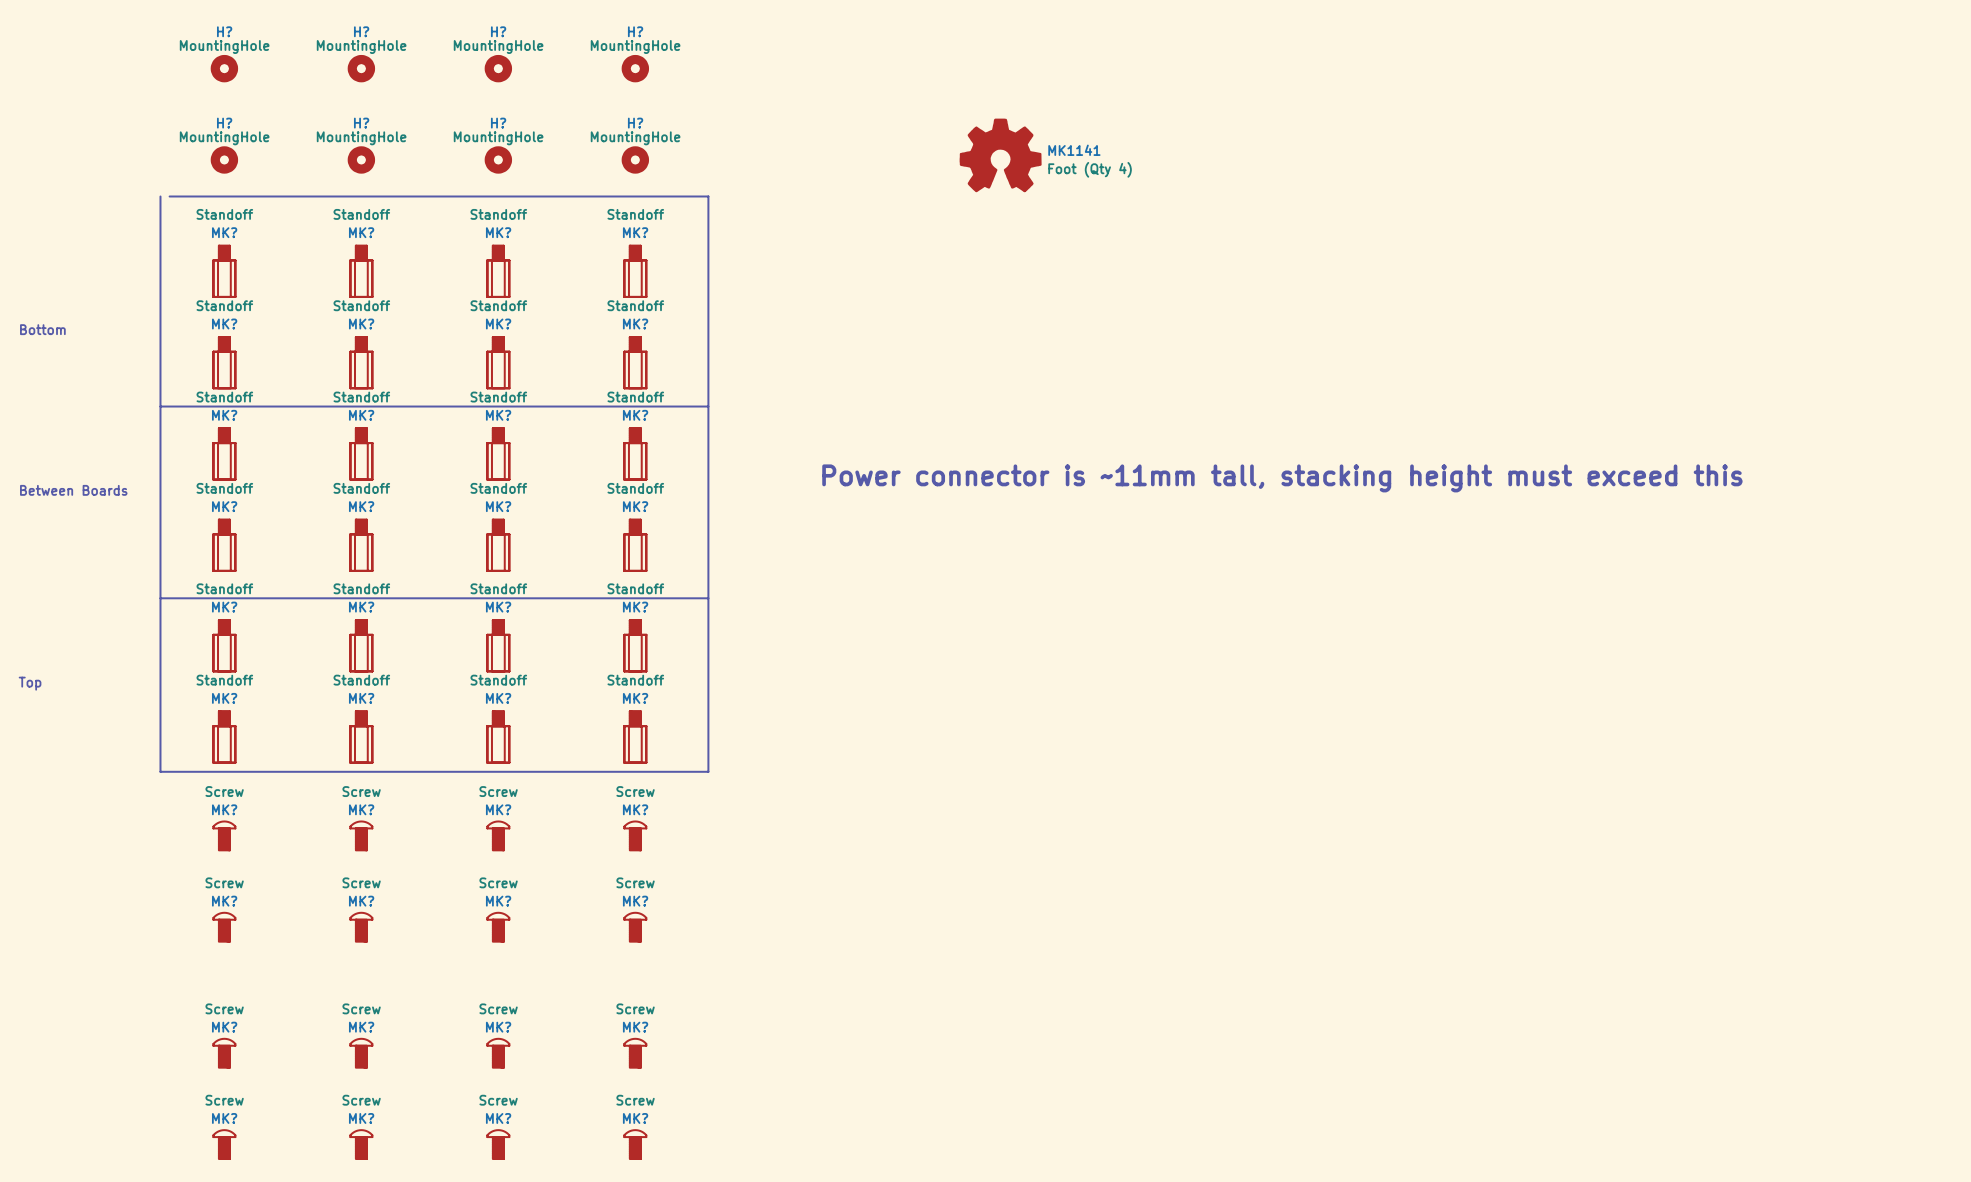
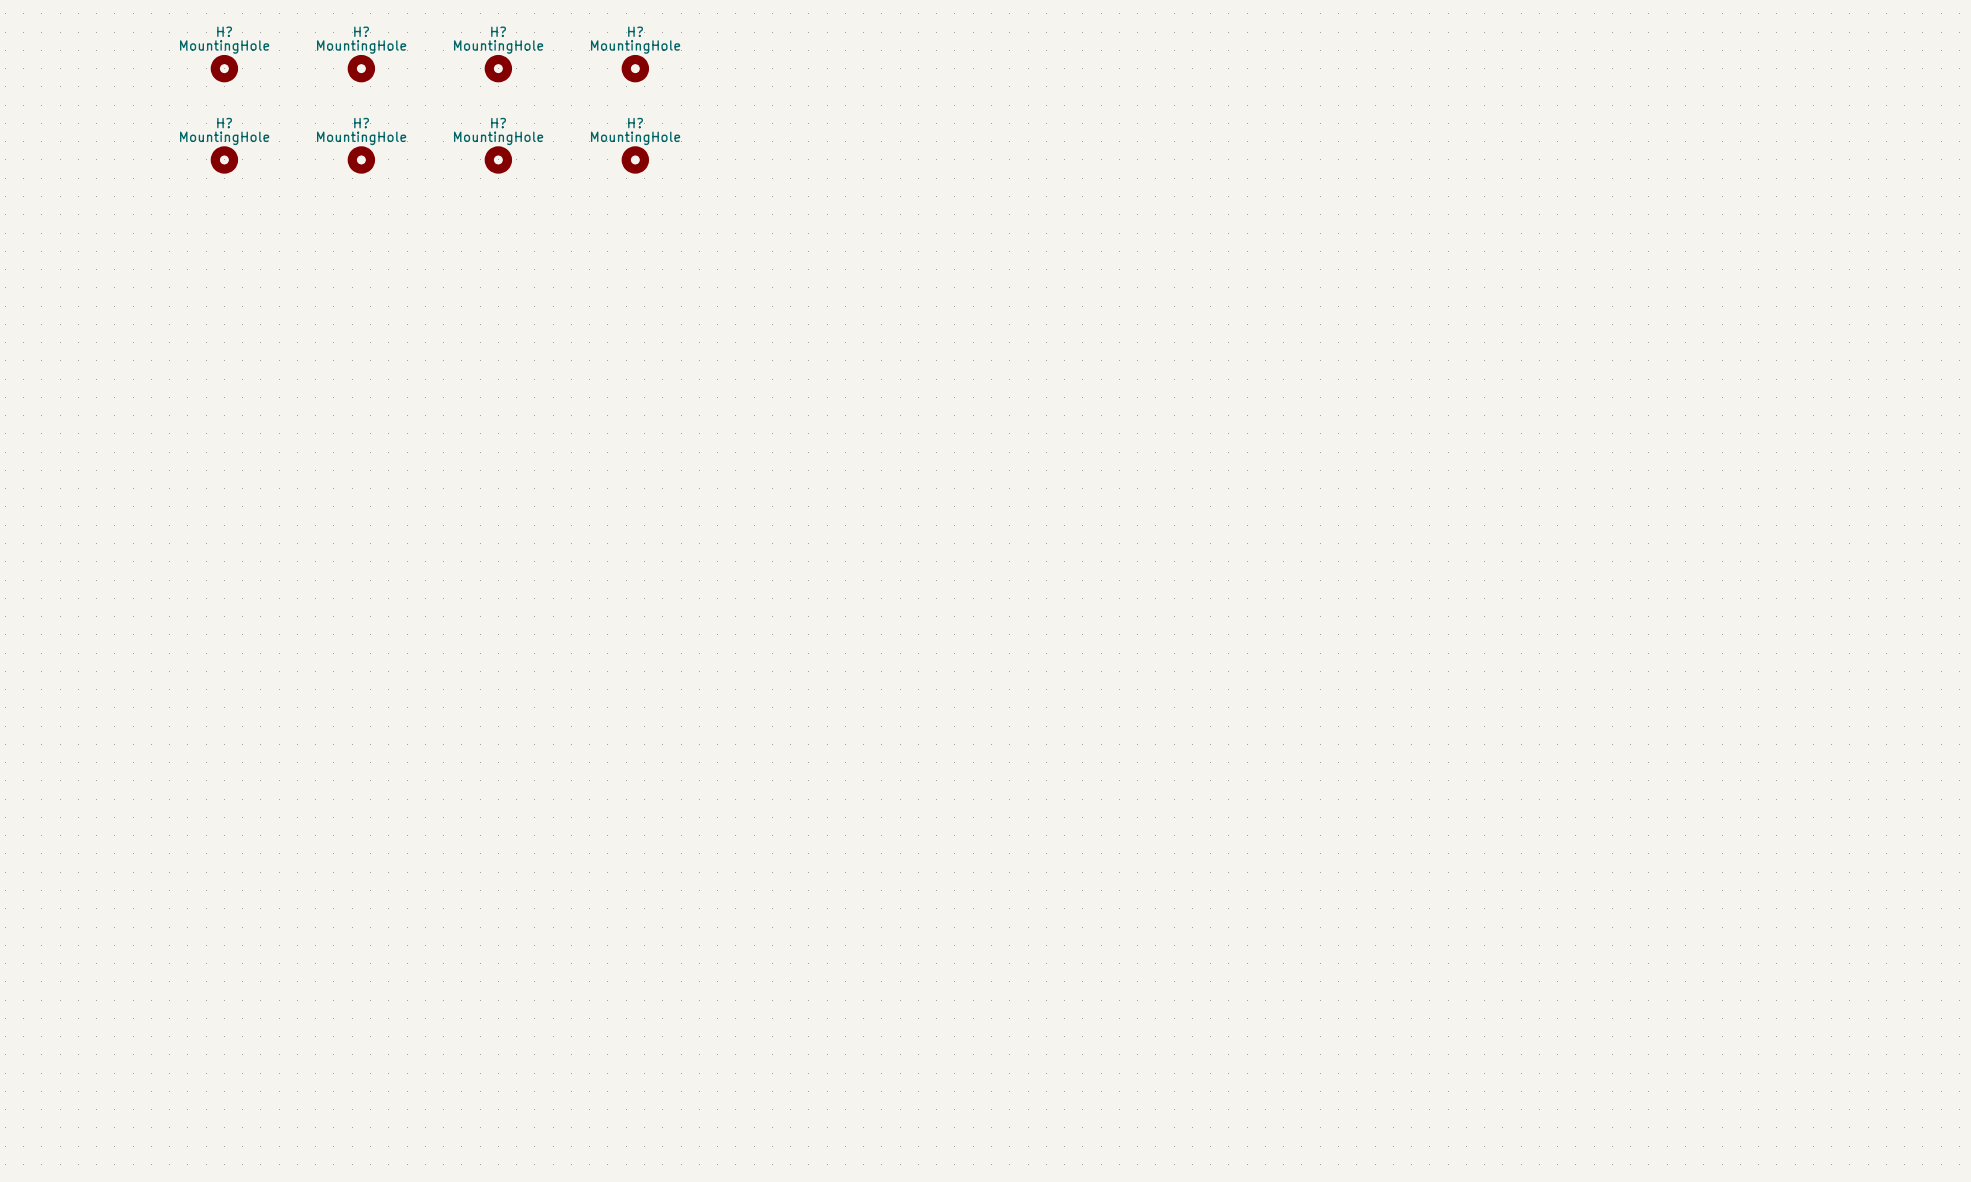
MK1141: Foot (Qty 4) (1000, 155) -> none
line: (160, 196) (160, 771) (708, 771) (708, 196) (169, 196) -> none
MK?: Standoff (224, 271) -> none
MK?: Standoff (361, 271) -> none
MK?: Standoff (498, 271) -> none
MK?: Standoff (635, 271) -> none
text: Bottom (42, 329) -> none
MK?: Standoff (224, 362) -> none
MK?: Standoff (361, 362) -> none
MK?: Standoff (498, 362) -> none
MK?: Standoff (635, 362) -> none
line: (160, 406) (708, 406) -> none
MK?: Standoff (224, 454) -> none
MK?: Standoff (361, 454) -> none
MK?: Standoff (498, 454) -> none
MK?: Standoff (635, 454) -> none
text: Power connector is ~11mm tall, stacking height must exceed this (1282, 478) -> none
text: Between Boards (73, 490) -> none
MK?: Standoff (224, 545) -> none
MK?: Standoff (361, 545) -> none
MK?: Standoff (498, 545) -> none
MK?: Standoff (635, 545) -> none
line: (160, 598) (708, 598) -> none
MK?: Standoff (224, 645) -> none
MK?: Standoff (361, 645) -> none
MK?: Standoff (498, 645) -> none
MK?: Standoff (635, 645) -> none
text: Top (30, 683) -> none
MK?: Standoff (224, 737) -> none
MK?: Standoff (361, 737) -> none
MK?: Standoff (498, 737) -> none
MK?: Standoff (635, 737) -> none
MK?: Screw (224, 835) -> none
MK?: Screw (361, 835) -> none
MK?: Screw (498, 835) -> none
MK?: Screw (635, 835) -> none
MK?: Screw (224, 927) -> none
MK?: Screw (361, 927) -> none
MK?: Screw (498, 927) -> none
MK?: Screw (635, 927) -> none
MK?: Screw (224, 1053) -> none
MK?: Screw (361, 1053) -> none
MK?: Screw (498, 1053) -> none
MK?: Screw (635, 1053) -> none
MK?: Screw (224, 1144) -> none
MK?: Screw (361, 1144) -> none
MK?: Screw (498, 1144) -> none
MK?: Screw (635, 1144) -> none

